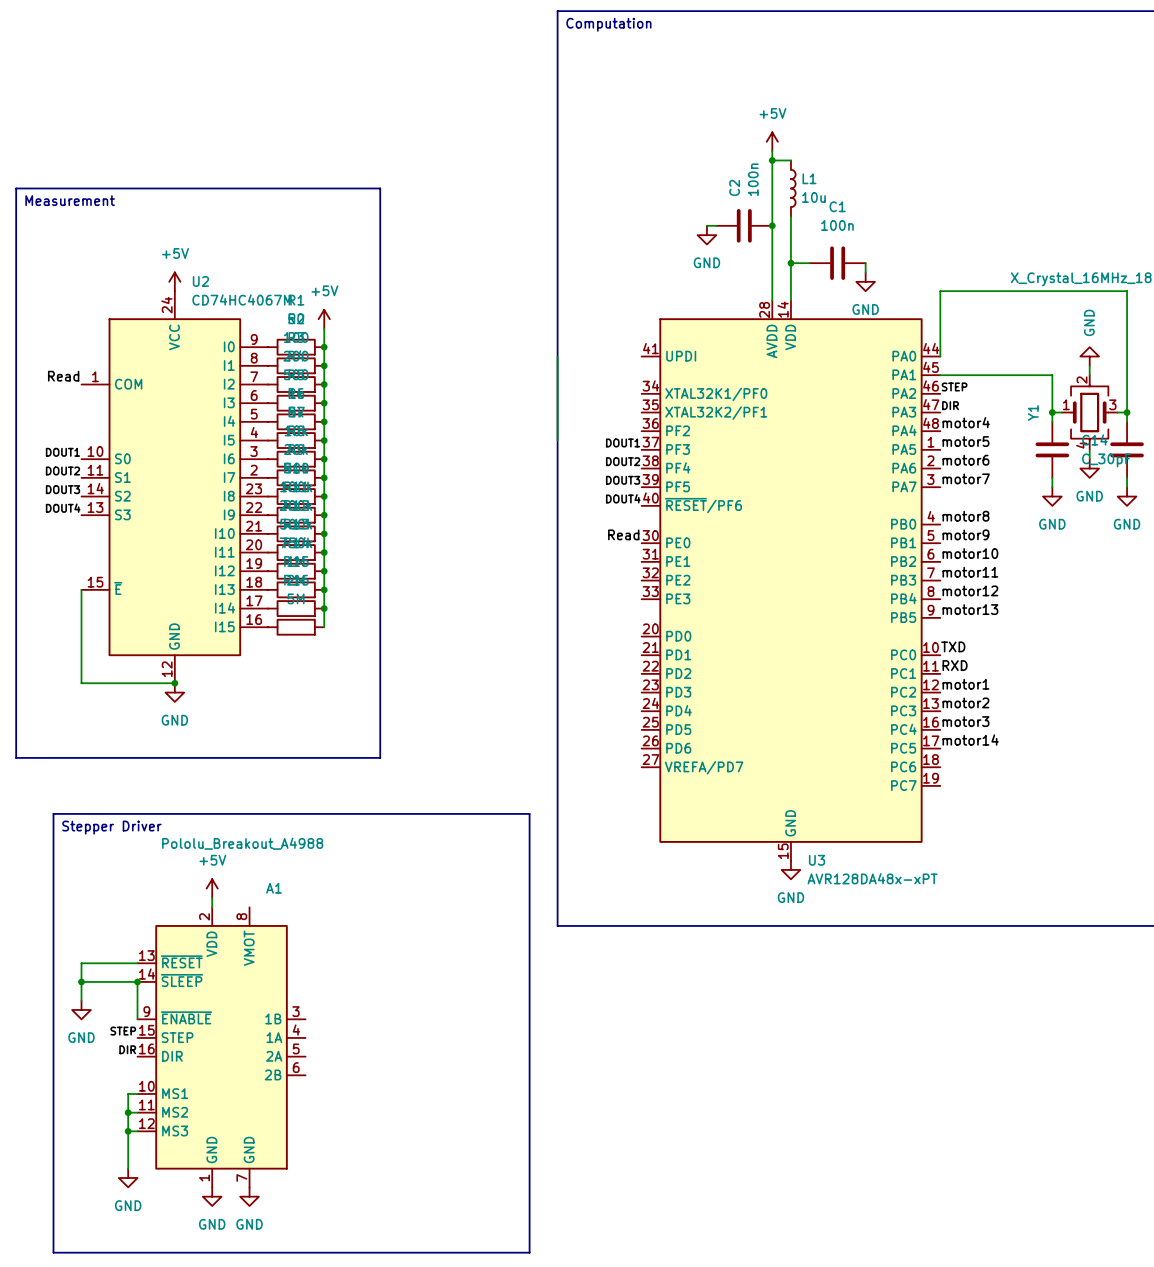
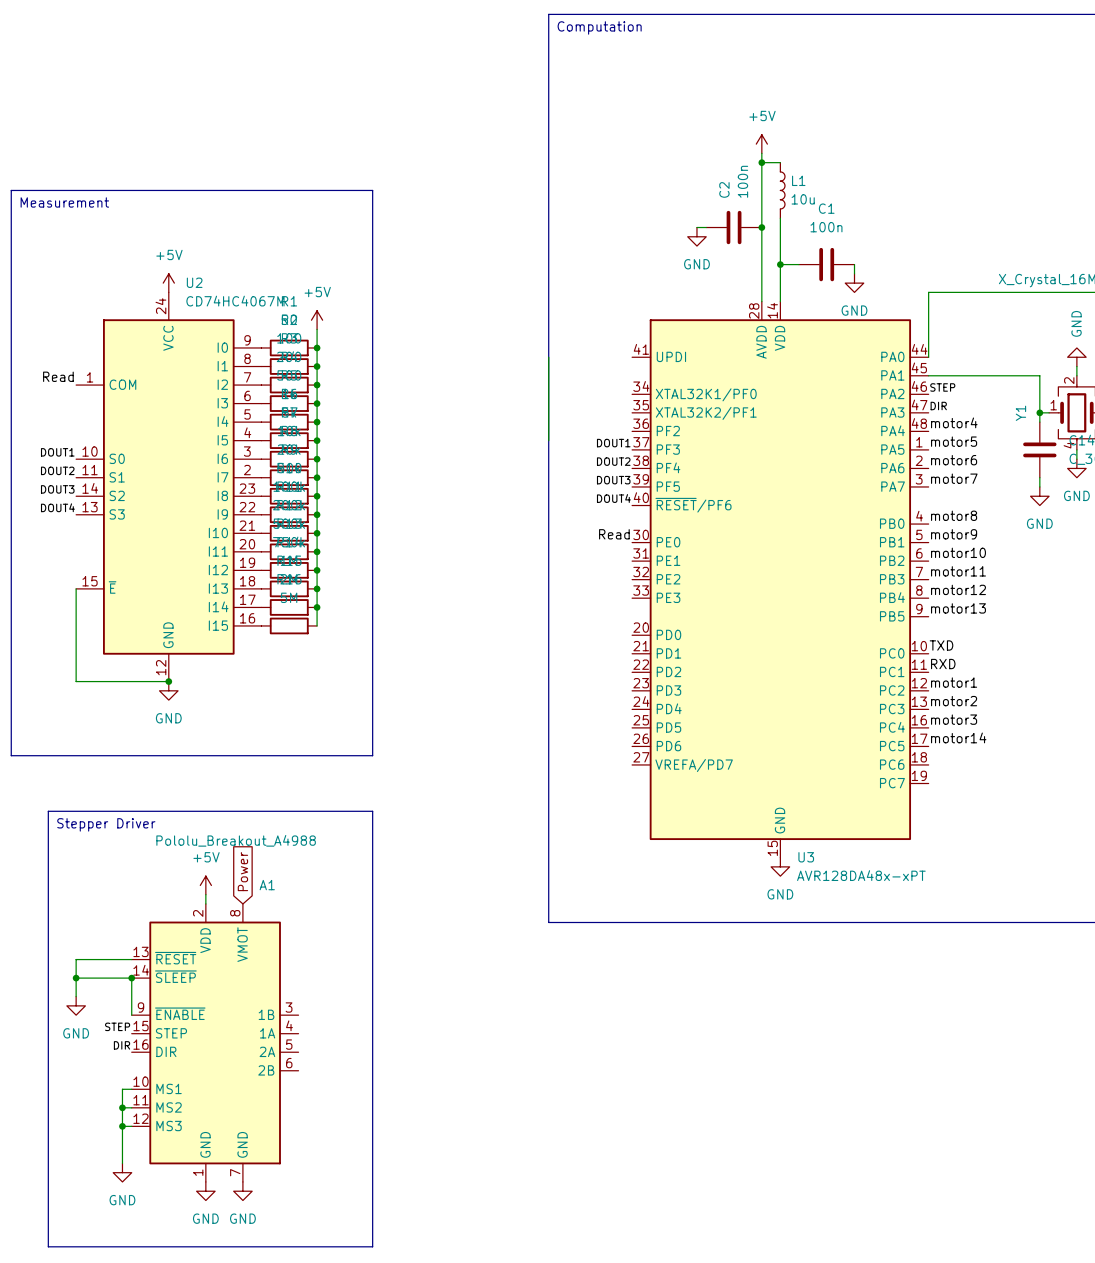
line: (380, 813) (529, 813) (529, 1252) (380, 1252) -> (372, 811) (372, 1246)
global label: none -> Power (242, 871)

